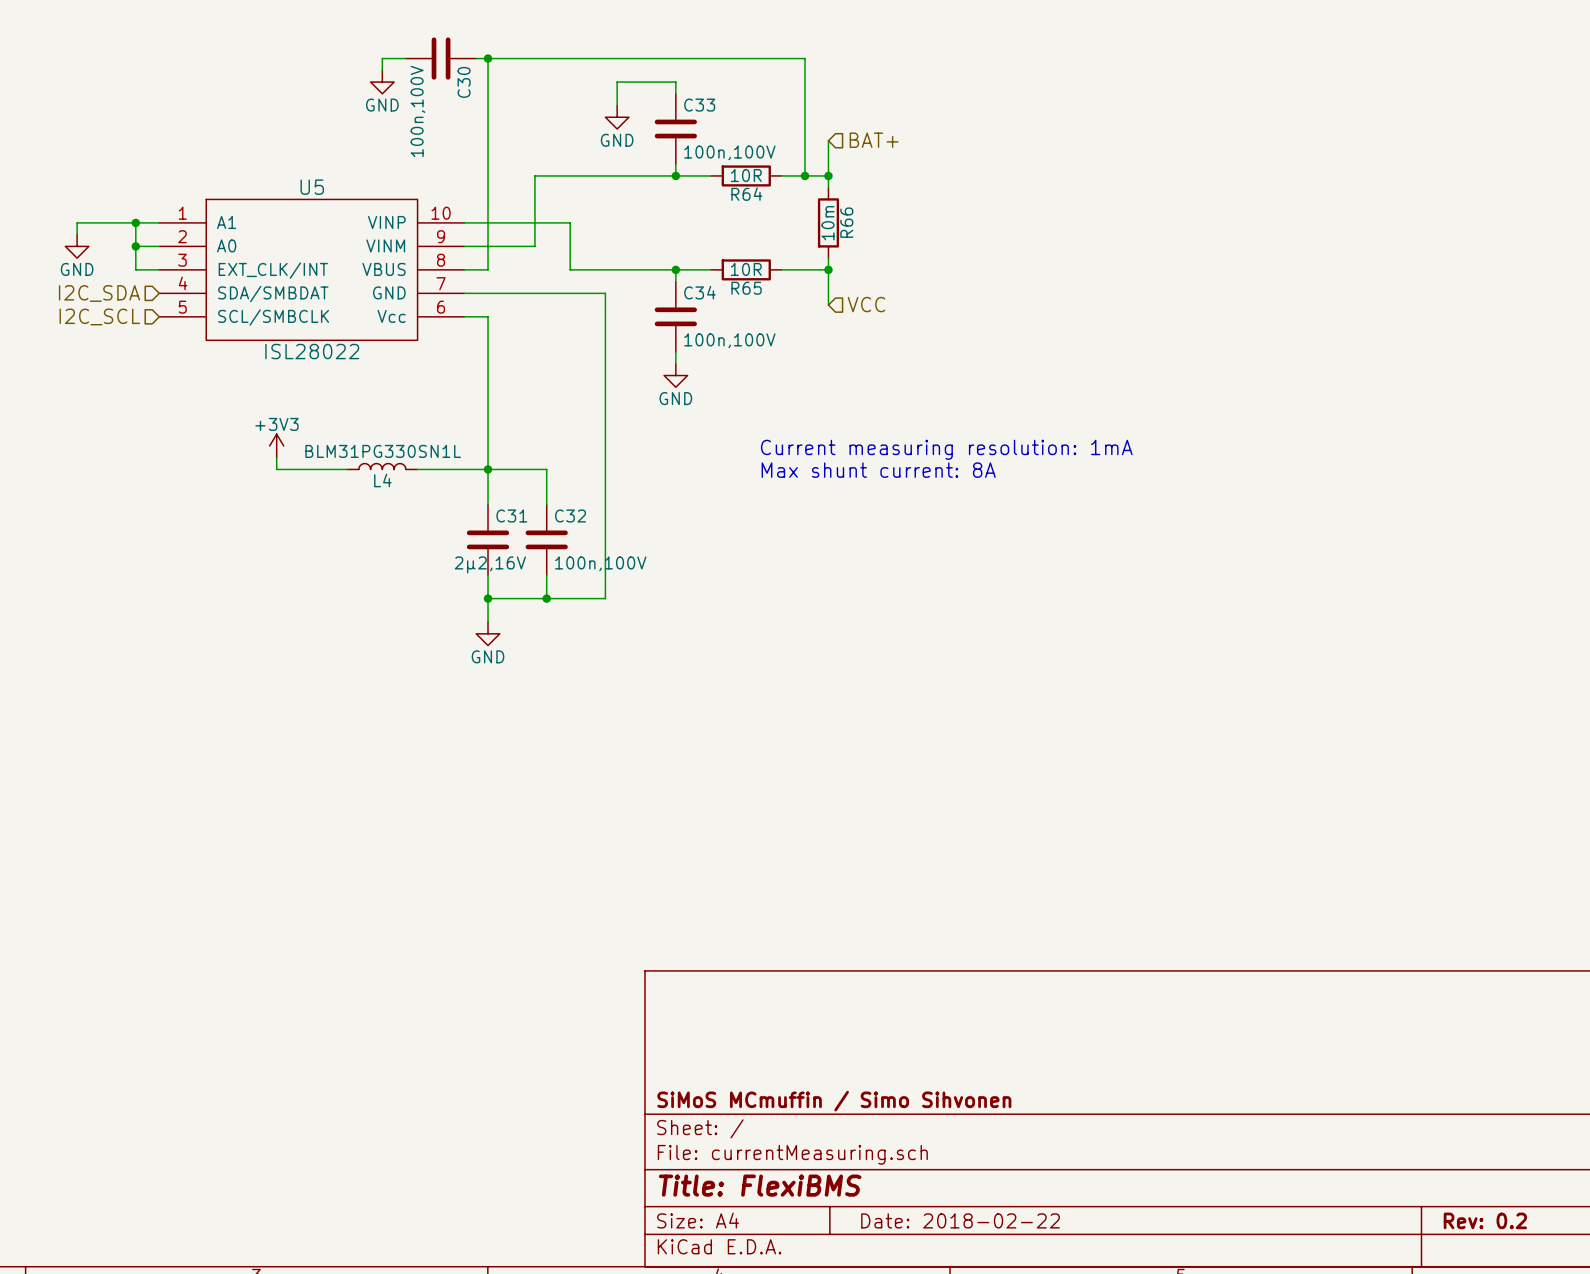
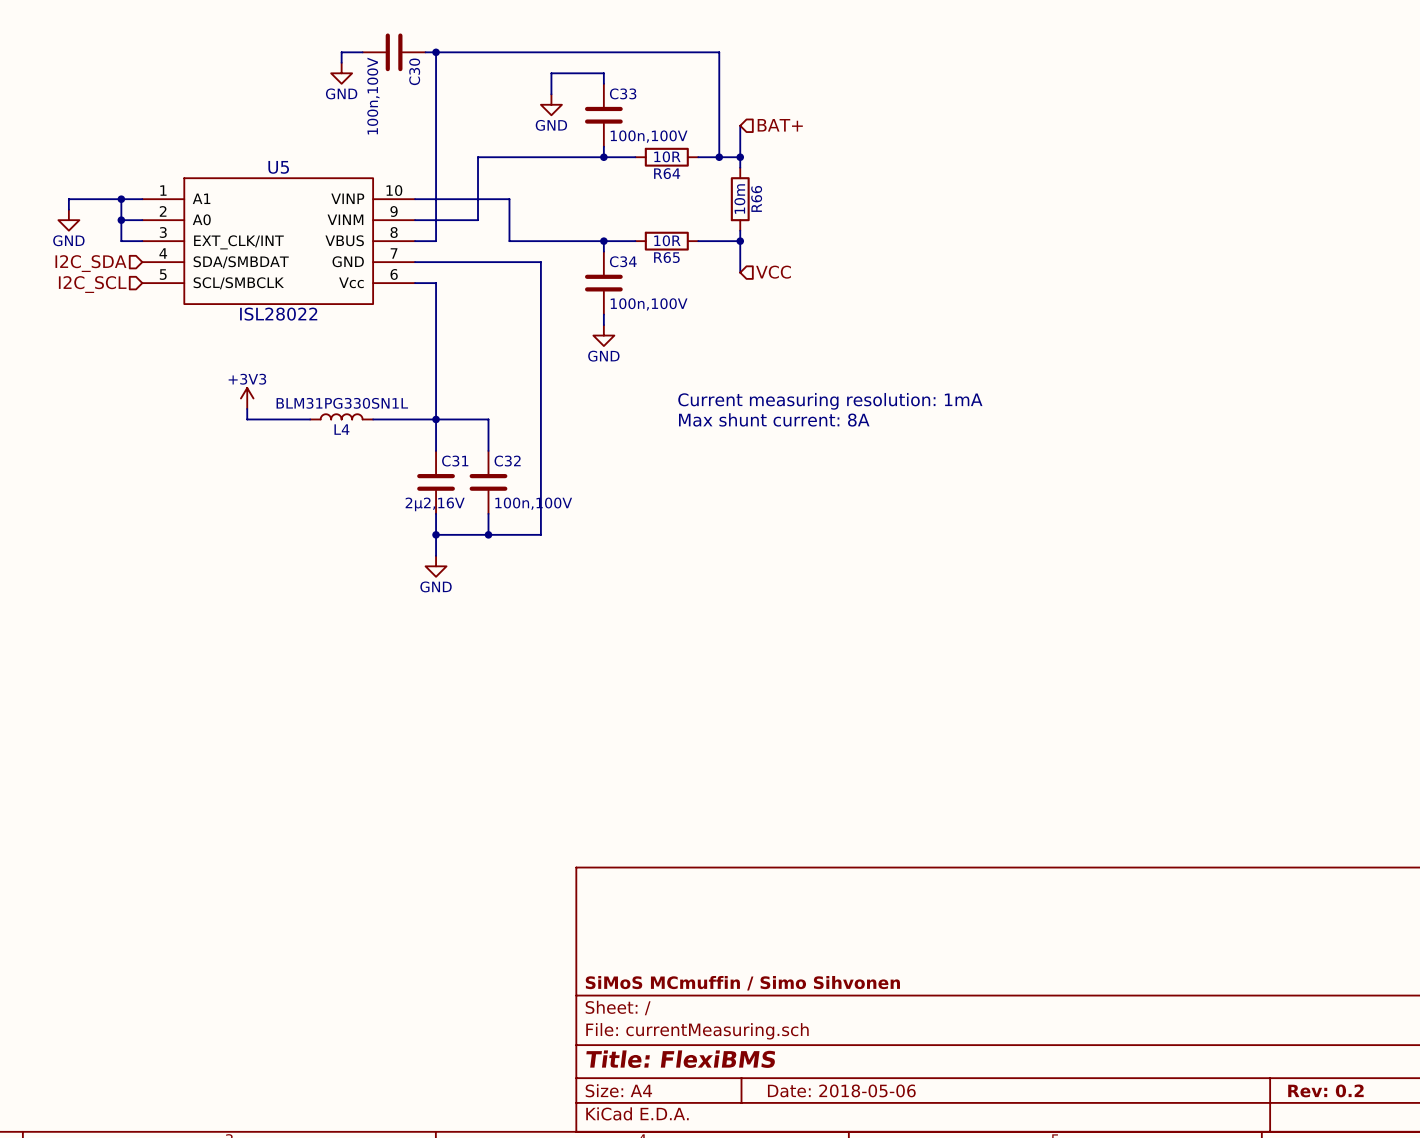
title block: Date: 2018-02-22 (960, 1220) -> Date: 2018-05-06 (841, 1090)

